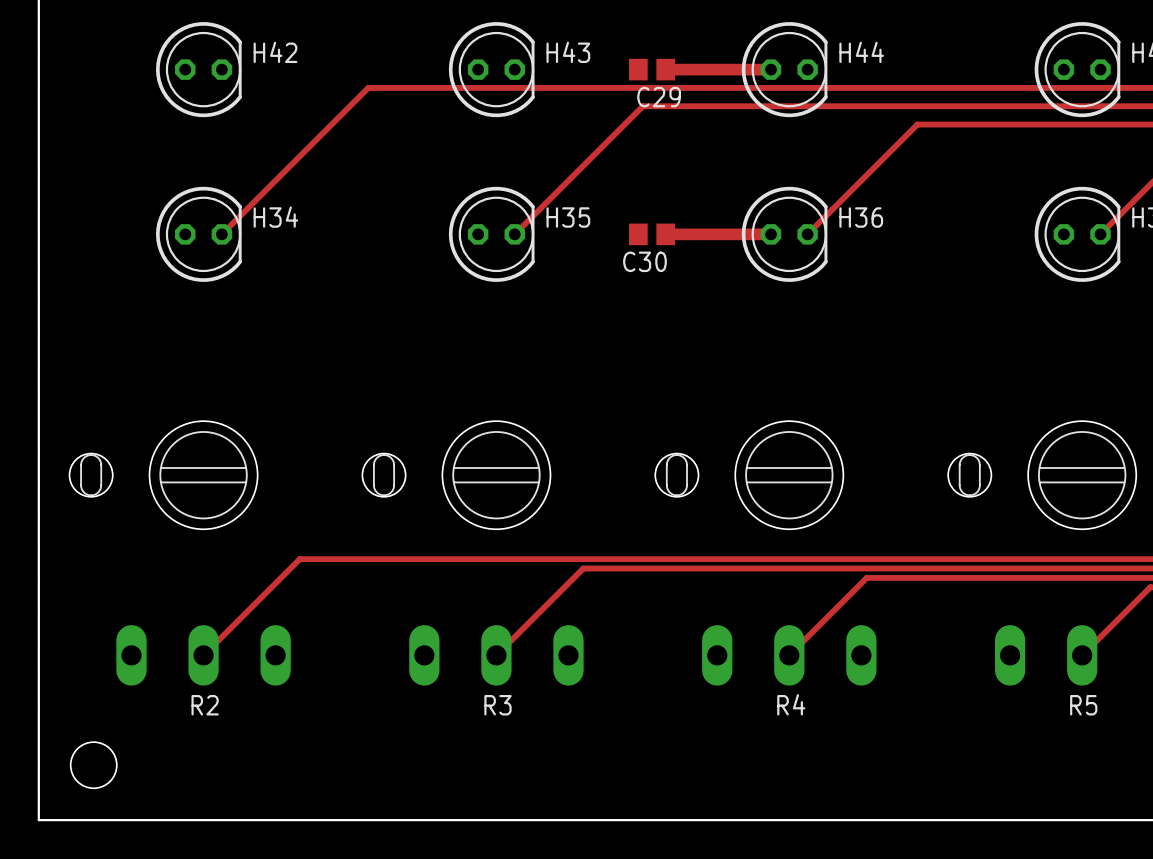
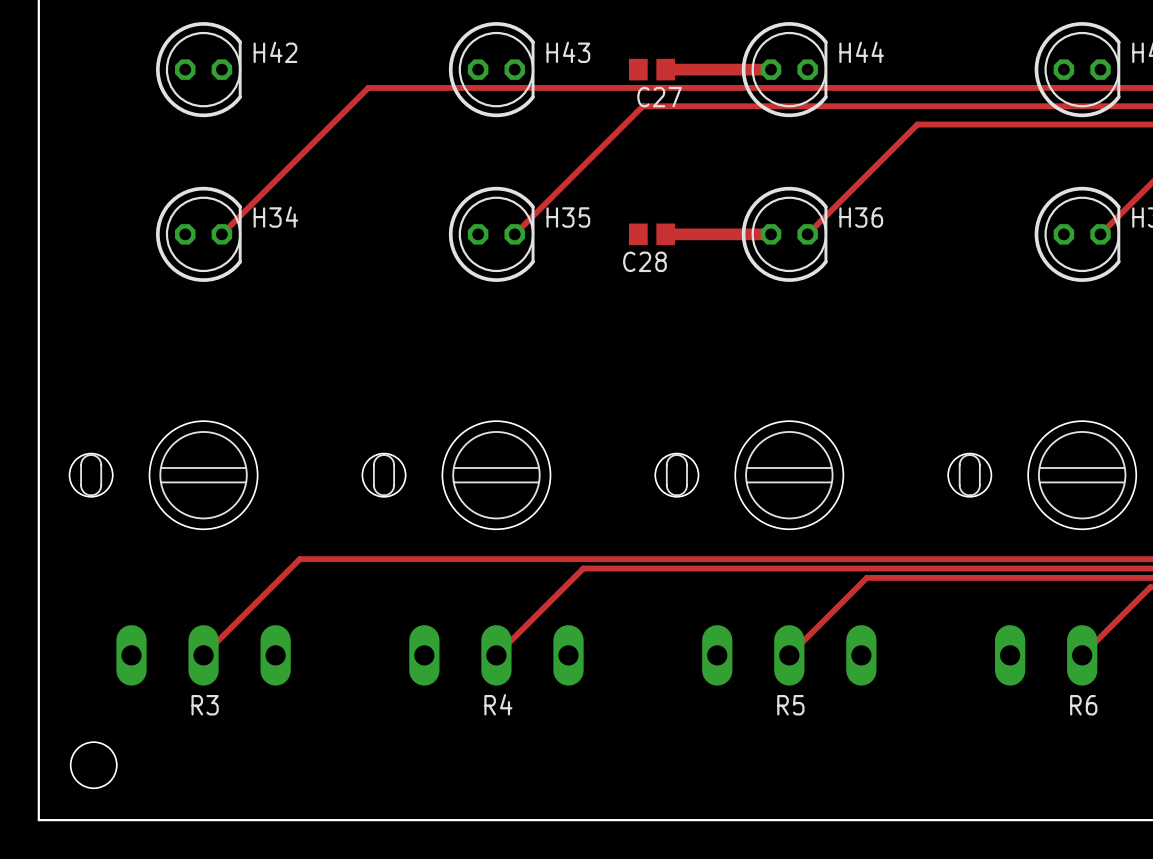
C29 name: C29 (659, 97) -> C27 (659, 97)
C30 name: C30 (644, 261) -> C28 (644, 261)
R4 name: R4 (791, 704) -> R5 (790, 705)
R2 name: R2 (205, 705) -> R3 (205, 705)
R3 name: R3 (498, 705) -> R4 (498, 704)
R5 name: R5 (1083, 705) -> R6 (1083, 705)

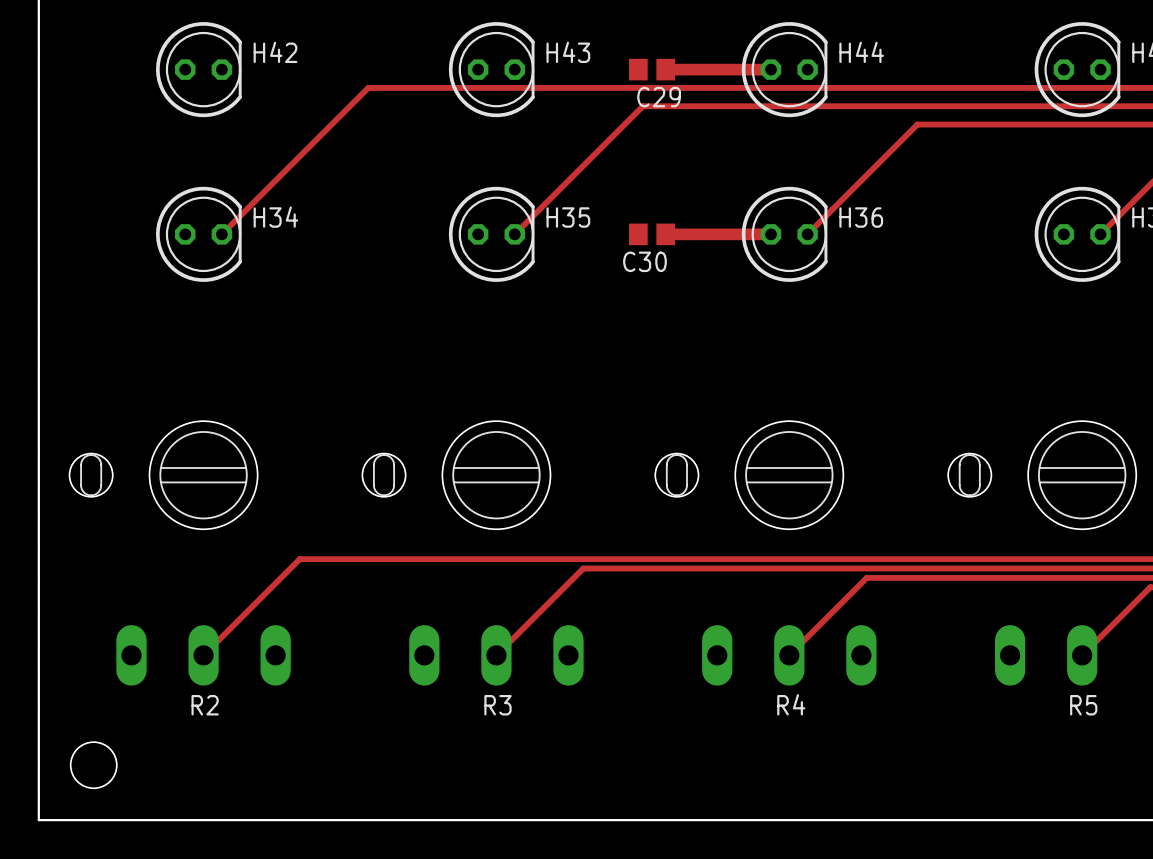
C27 name: C27 (659, 97) -> C29 (659, 97)
C28 name: C28 (644, 261) -> C30 (644, 261)
R4 name: R4 (498, 704) -> R3 (498, 705)
R3 name: R3 (205, 705) -> R2 (205, 705)
R5 name: R5 (790, 705) -> R4 (791, 704)
R6 name: R6 (1083, 705) -> R5 (1083, 705)

